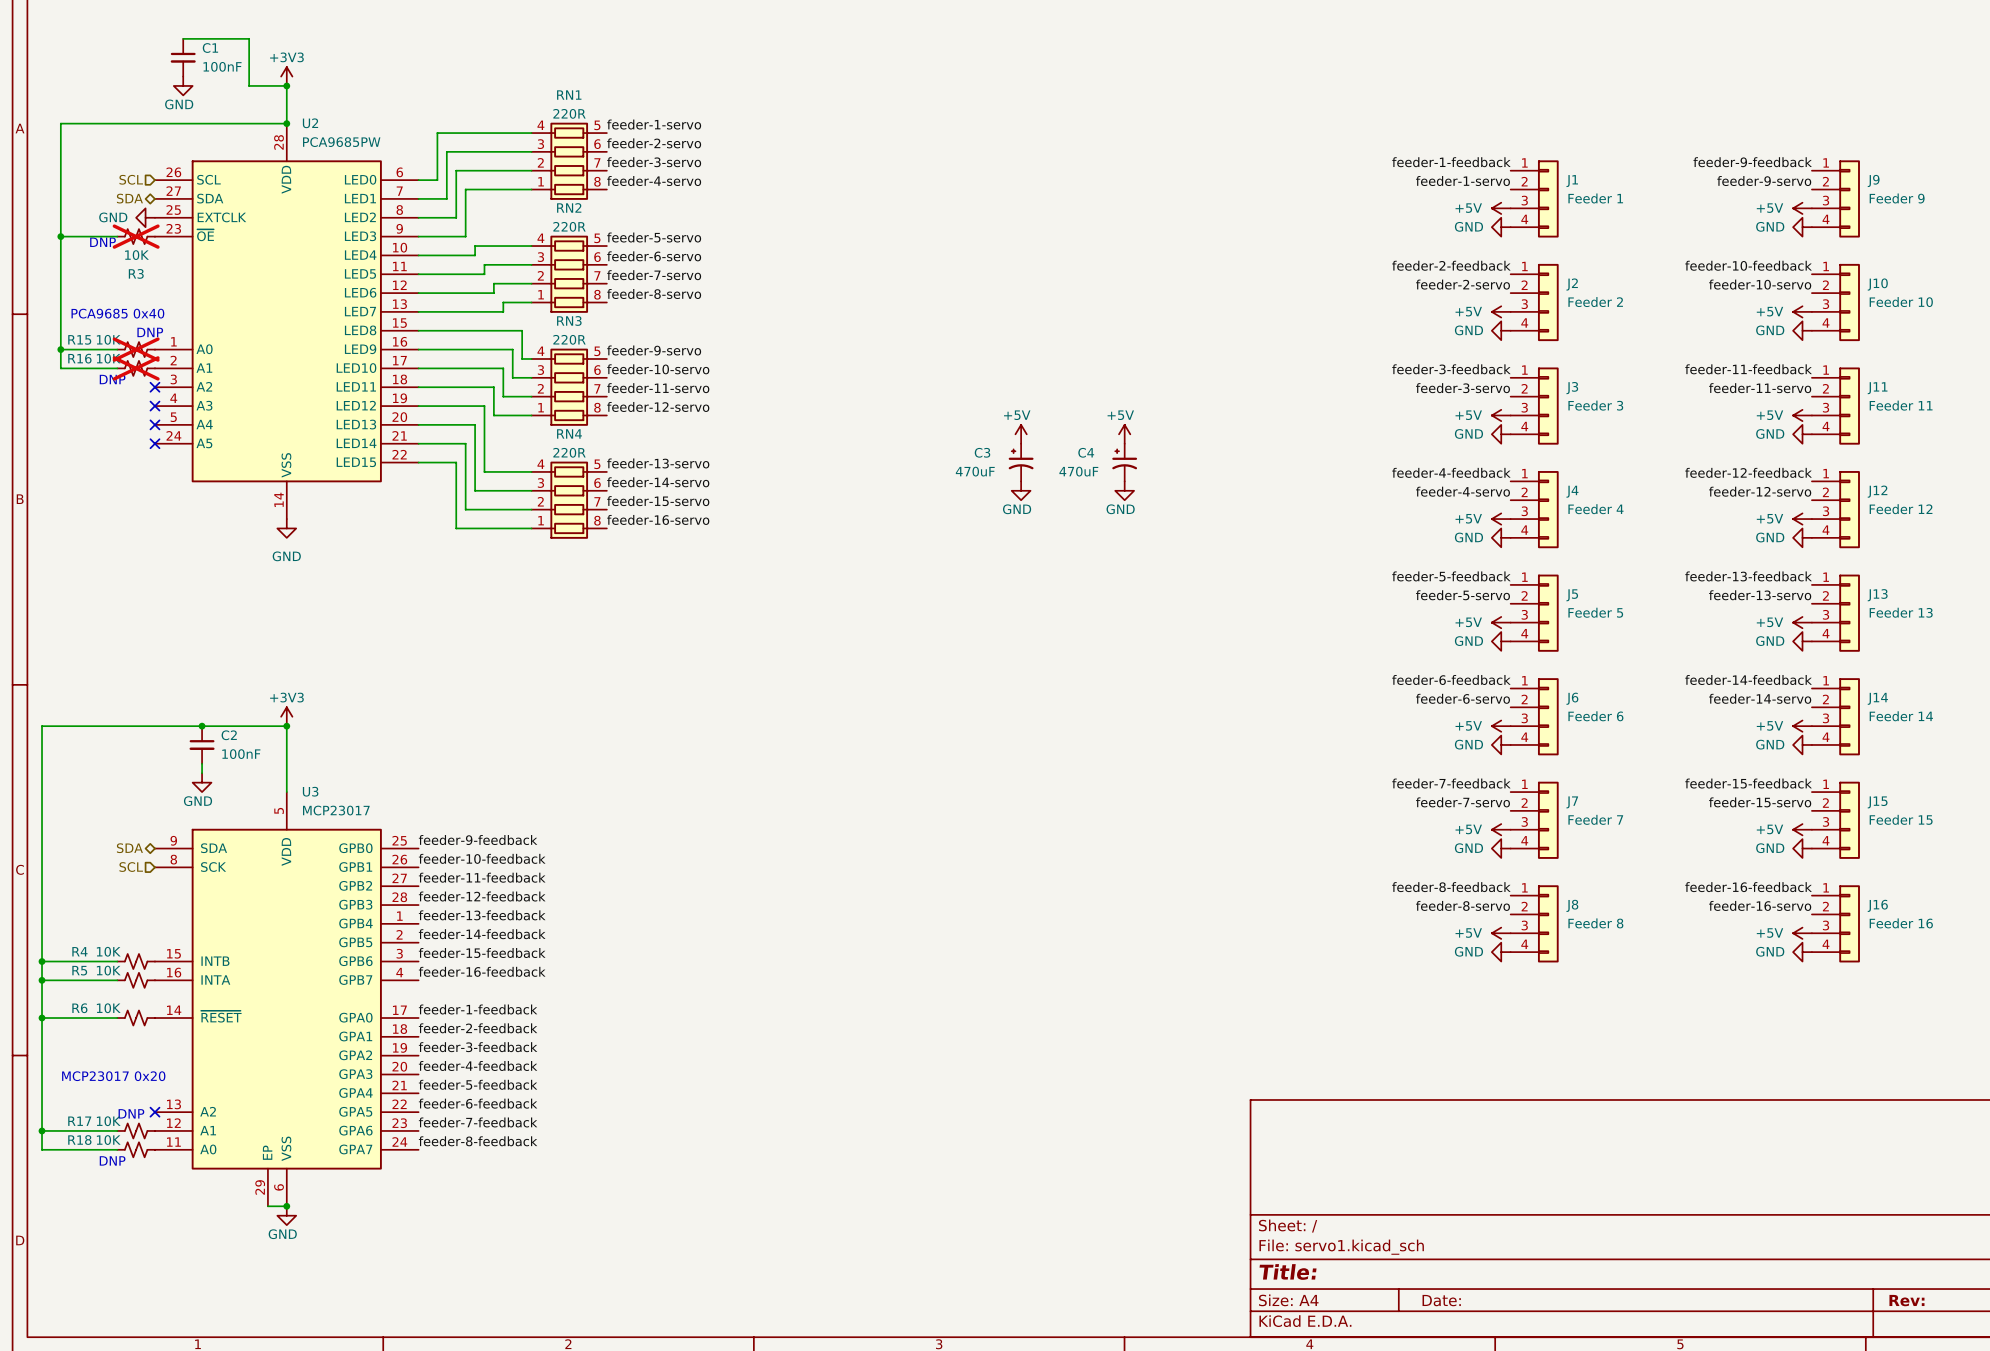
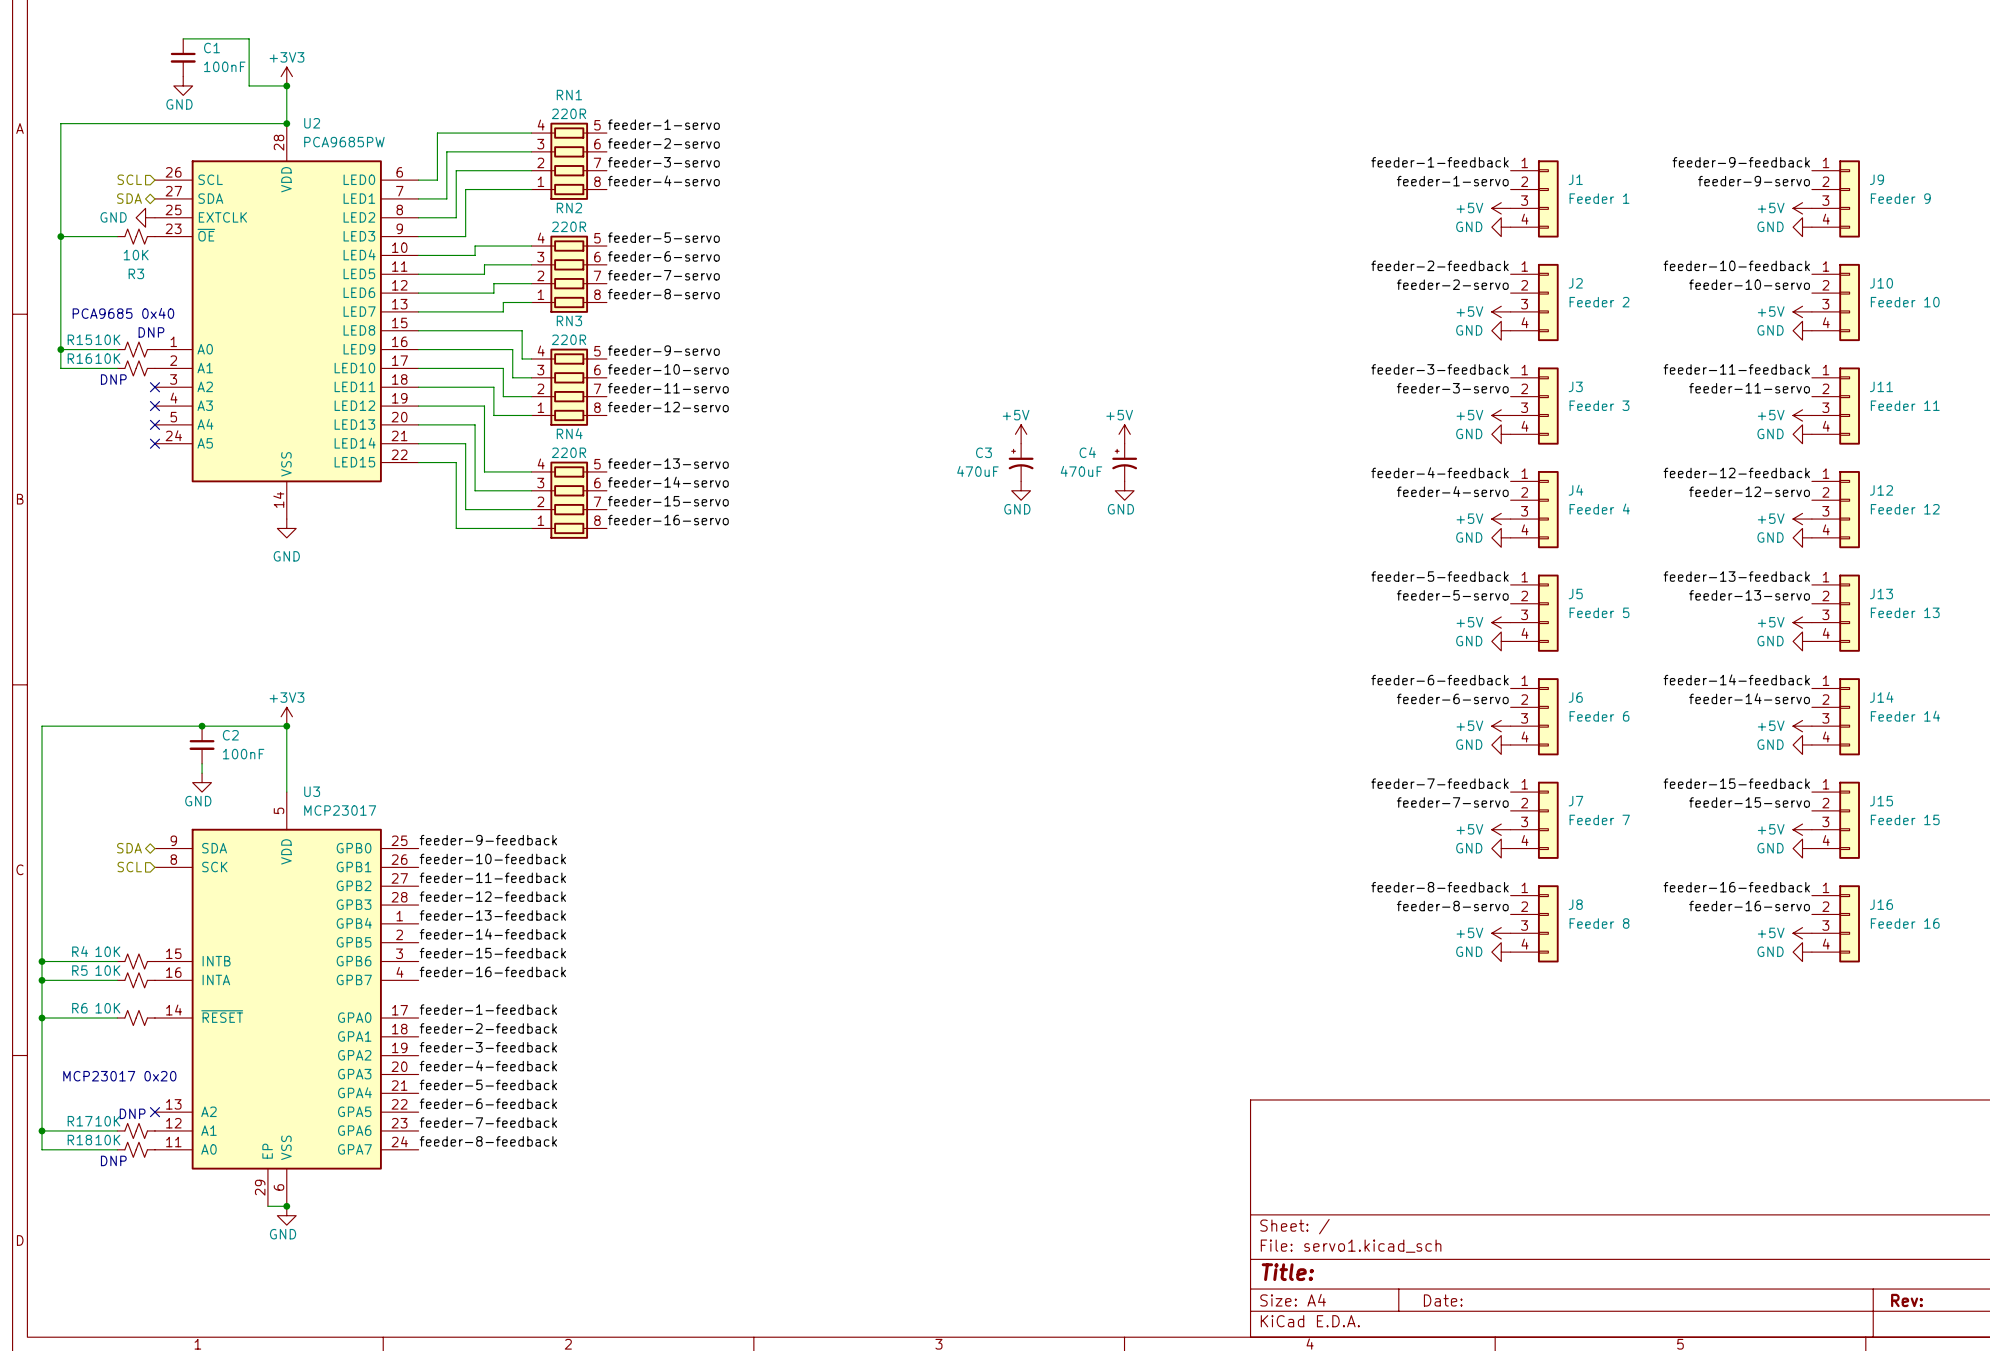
R3 do-not-place cross: (136, 236) -> none
text: DNP (102, 242) -> none
R15 do-not-place cross: (136, 349) -> none
R16 do-not-place cross: (136, 368) -> none

